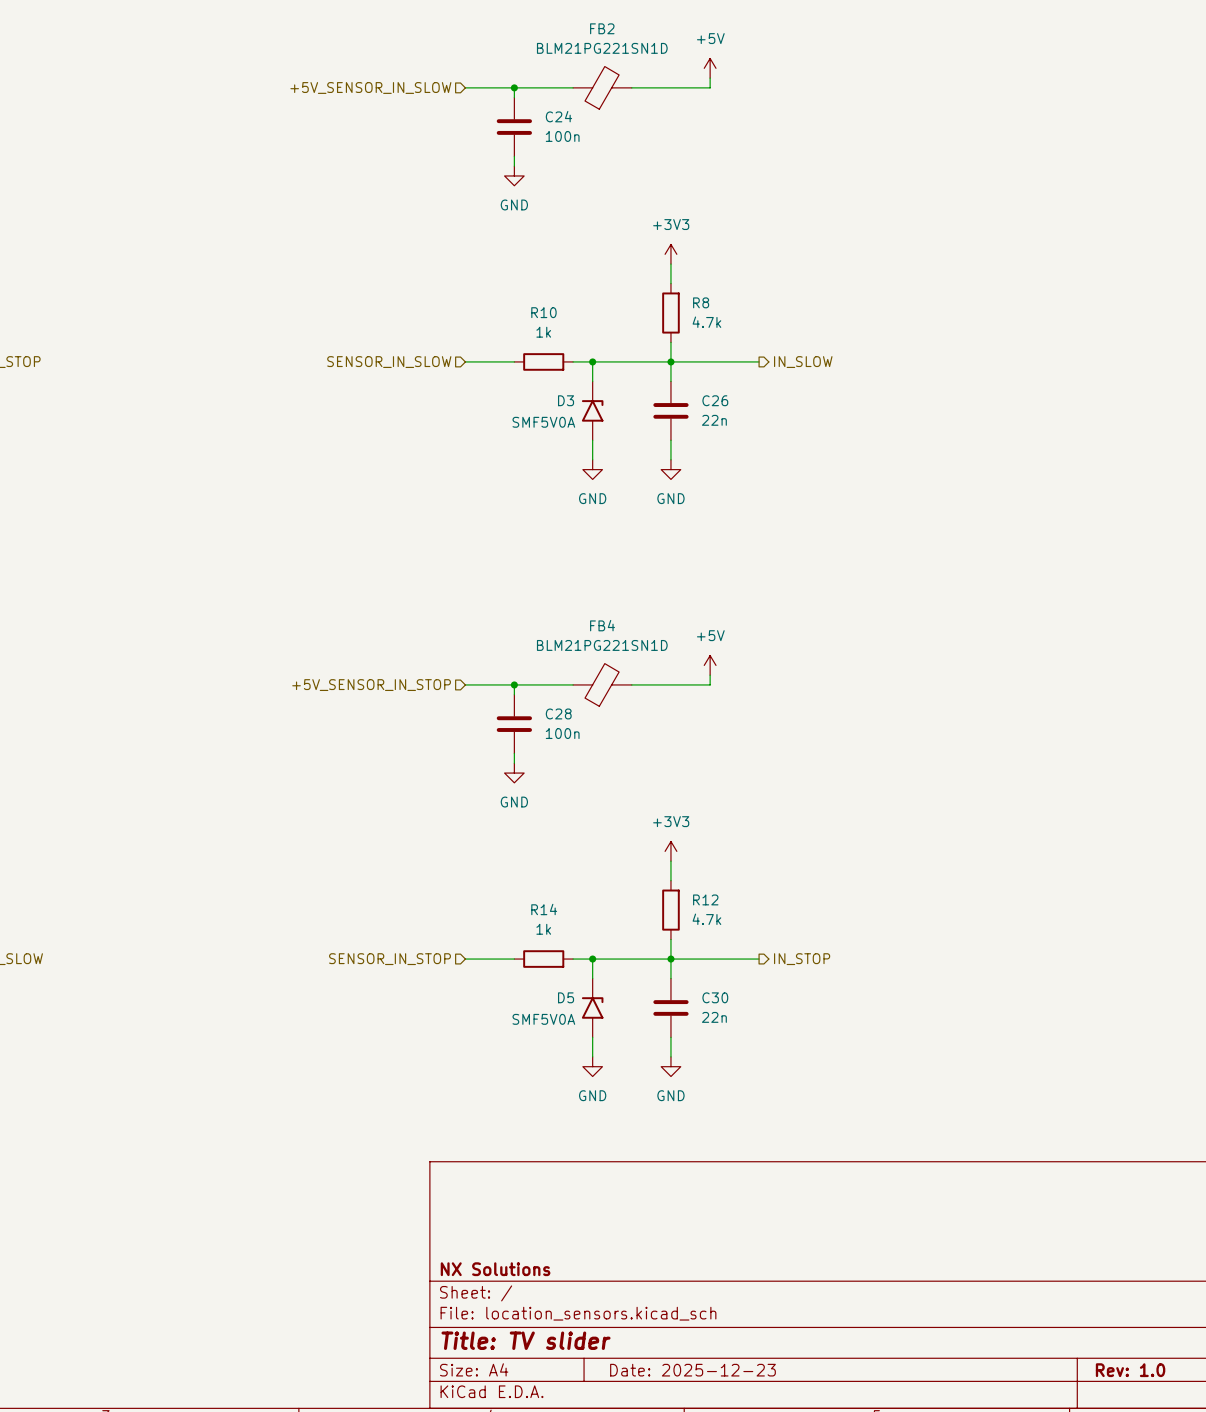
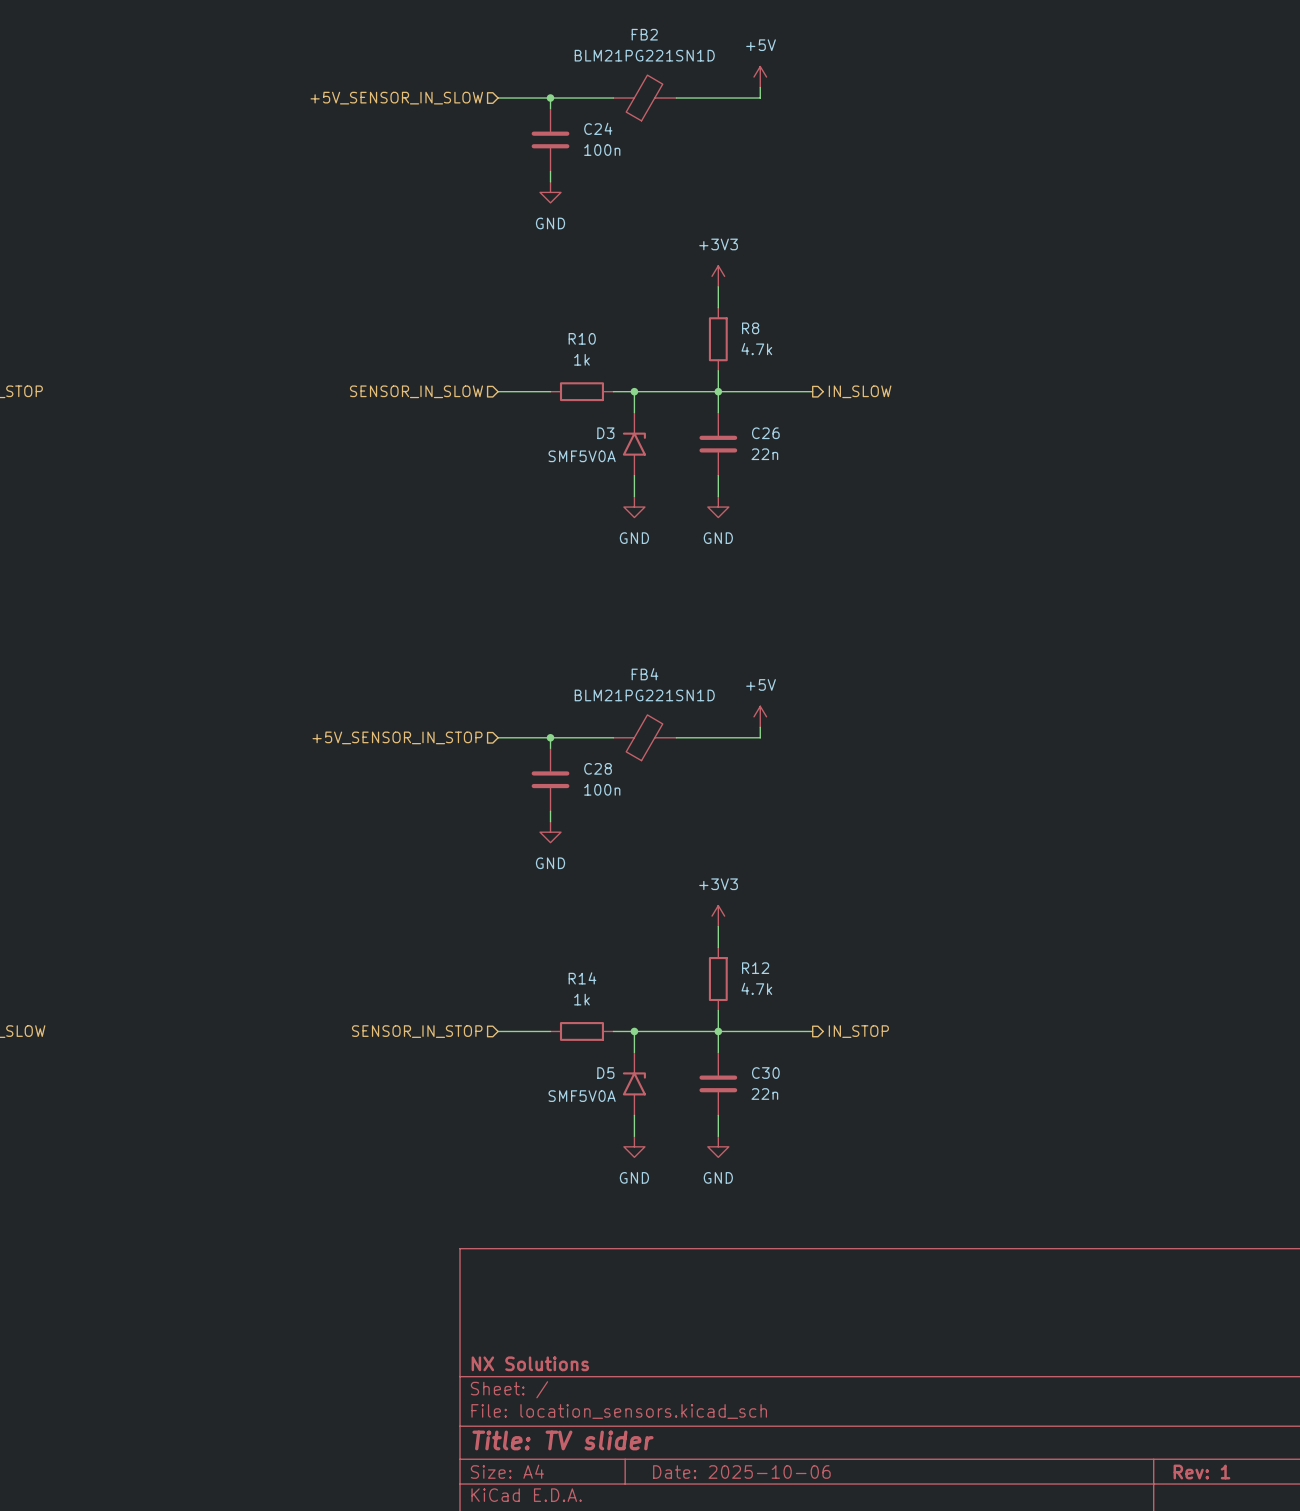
title block: Date: 2025-12-23 (692, 1370) -> Date: 2025-10-06 (741, 1472)
title block: Rev: 1.0 (1130, 1370) -> Rev: 1 (1201, 1472)

